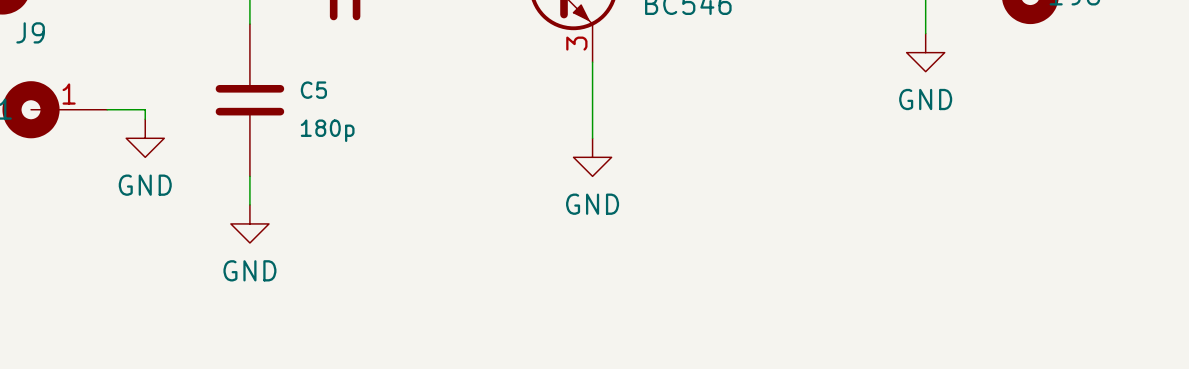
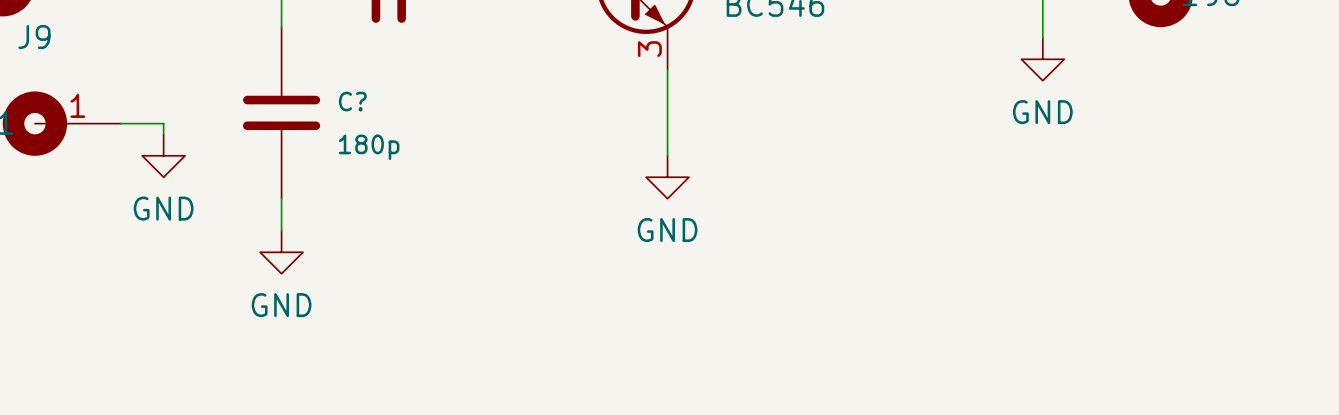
C5 name: C5 (313, 90) -> C? (352, 101)

